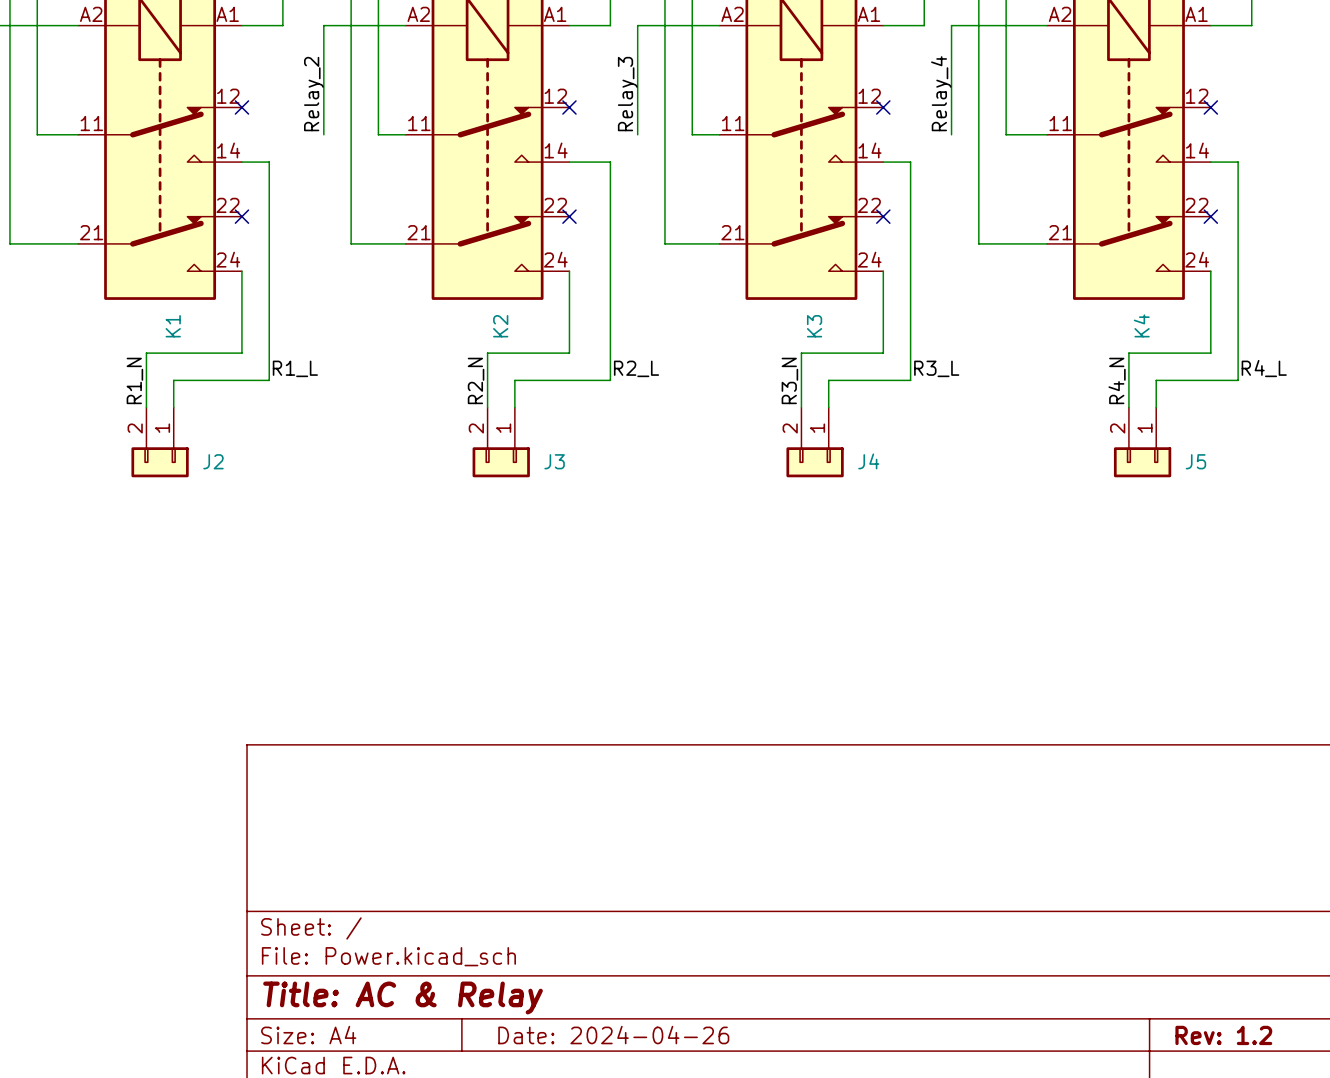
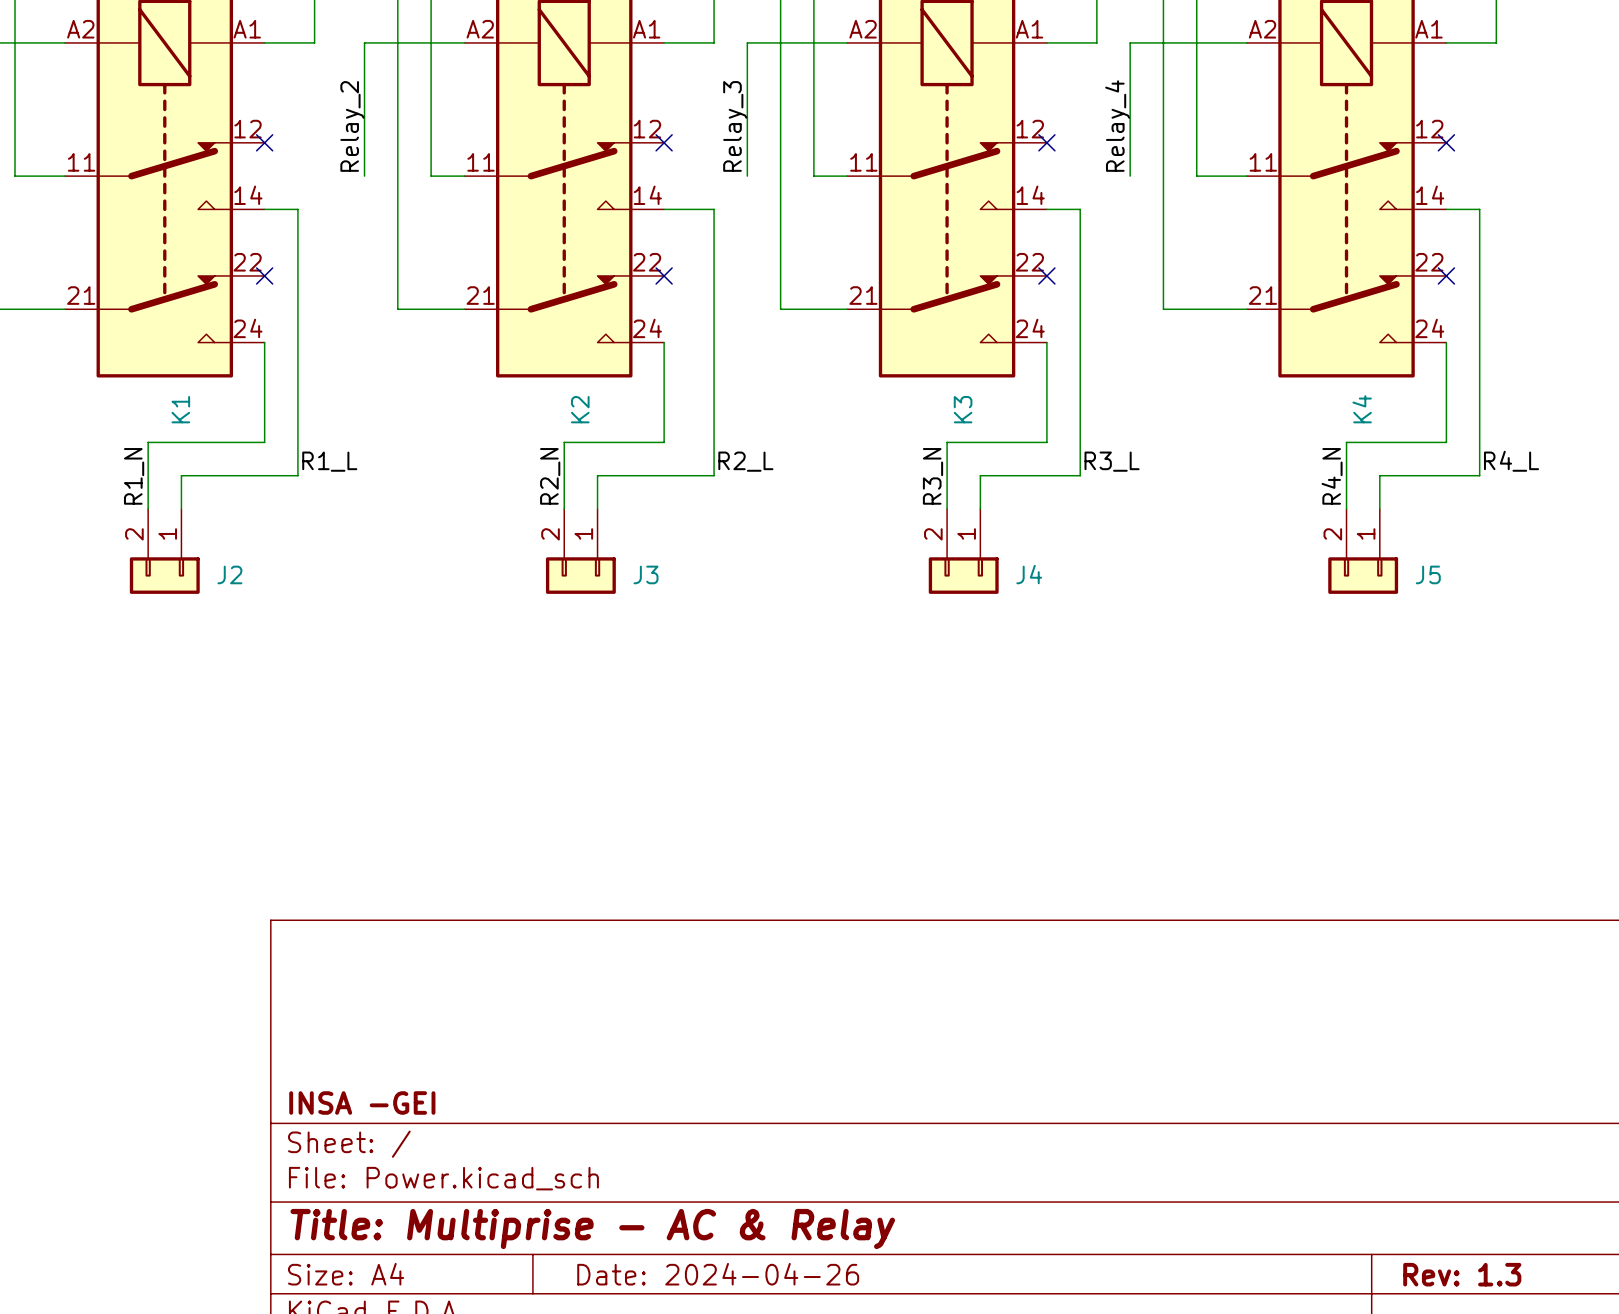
title block: none -> INSA -GEI (362, 1103)
title block: Title: AC & Relay (403, 997) -> Title: Multiprise - AC & Relay (592, 1229)
title block: Rev: 1.2 (1223, 1035) -> Rev: 1.3 (1462, 1274)

